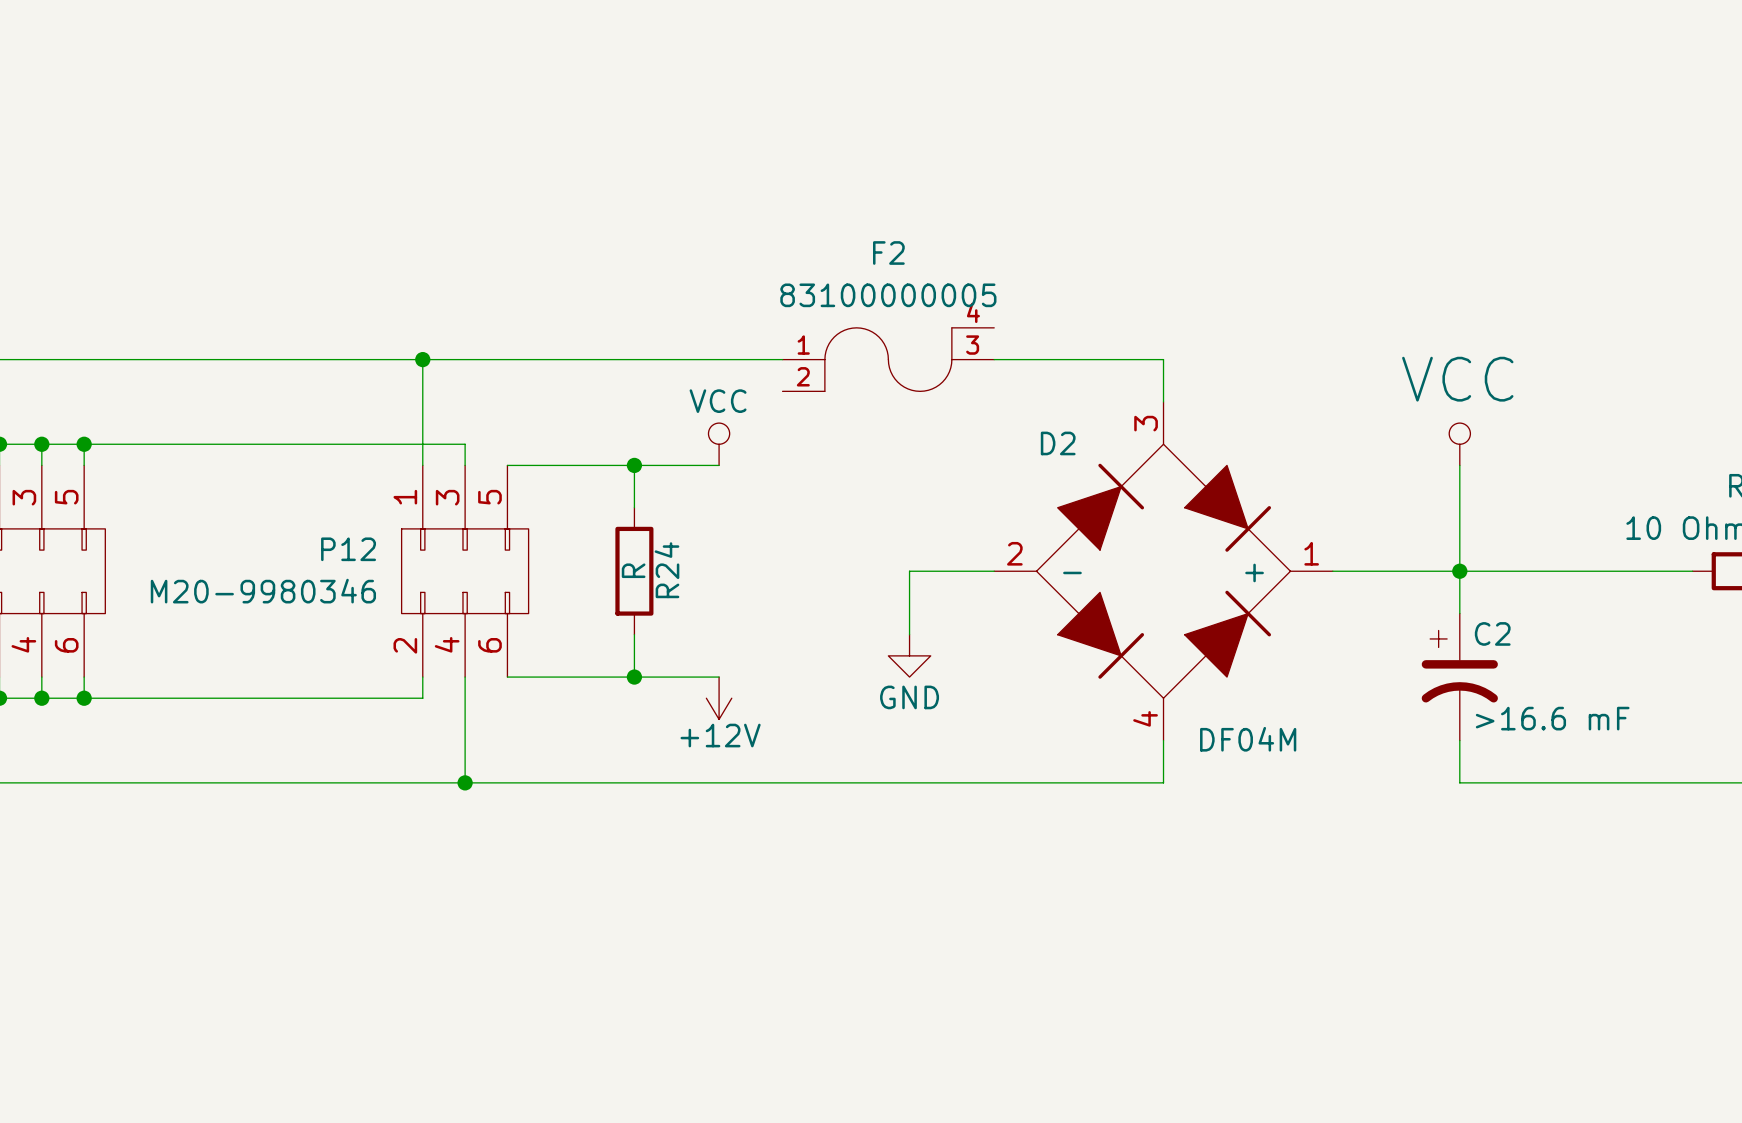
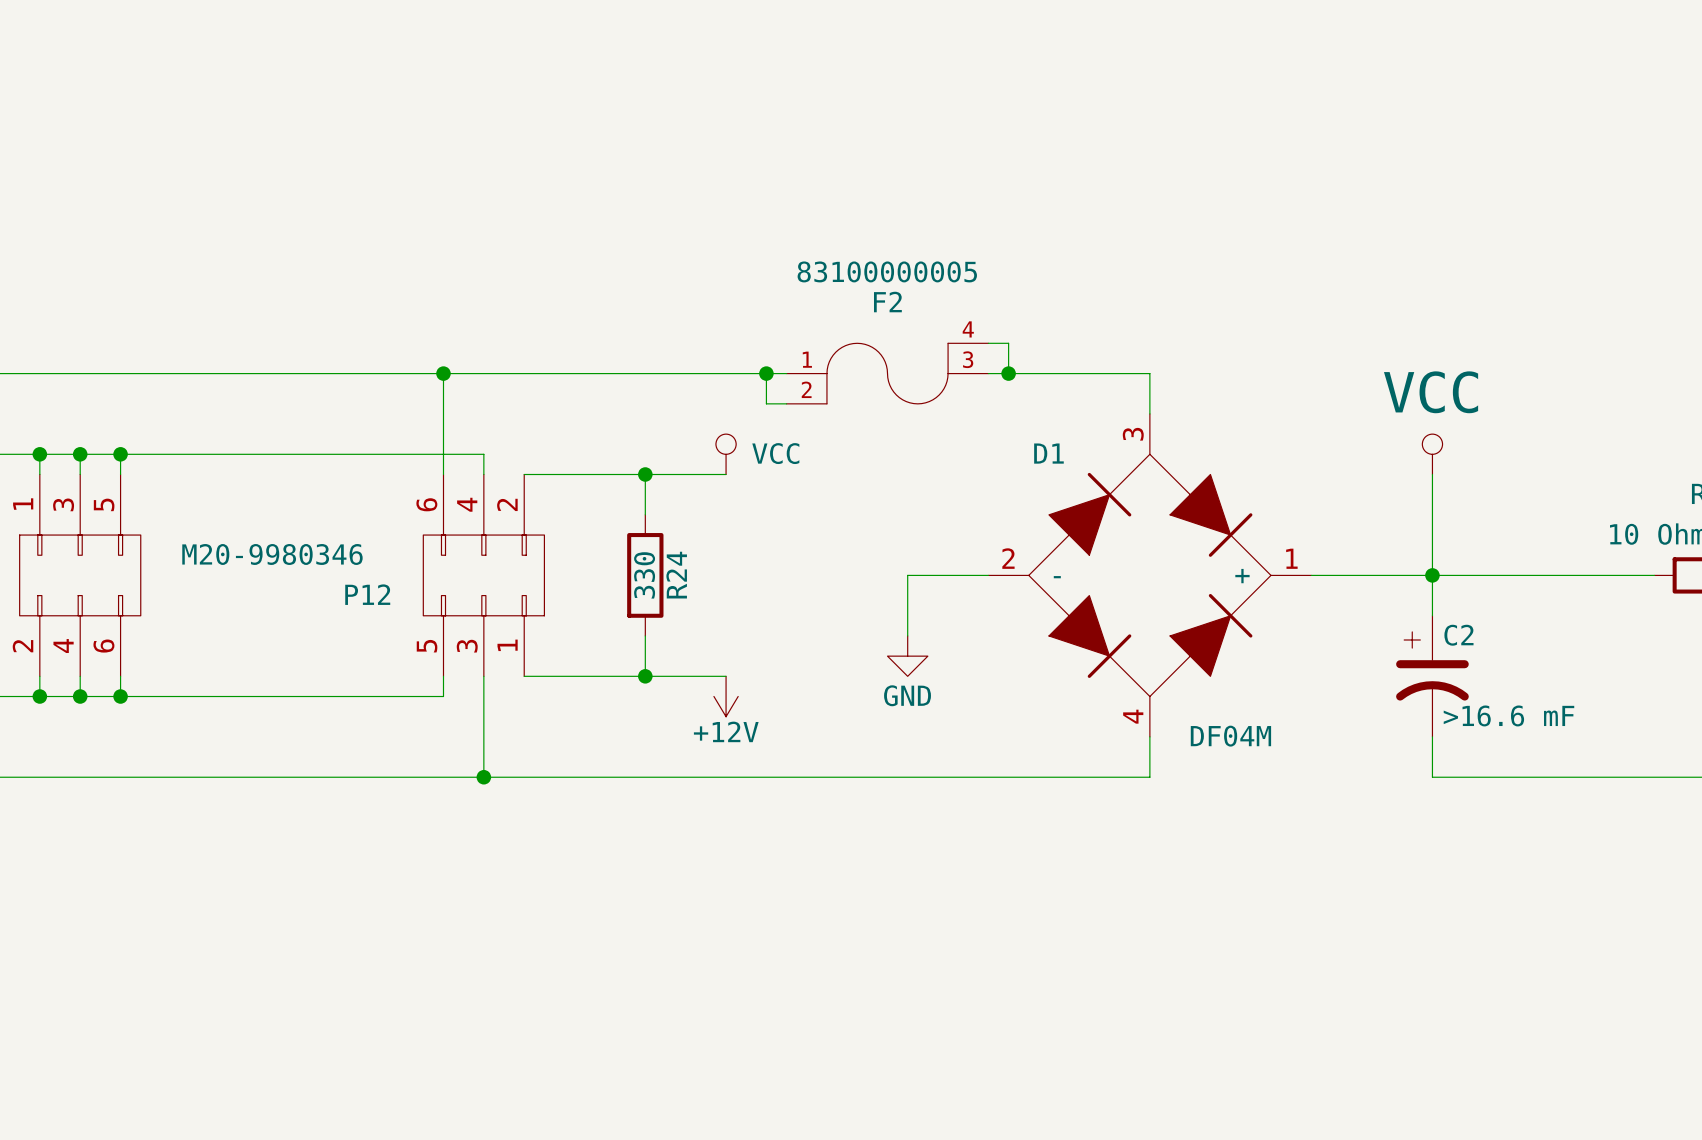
F2 name position: F2 (888, 252) -> F2 (887, 302)
F2 value position: 83100000005 (888, 295) -> 83100000005 (887, 271)
wire: none -> (988, 343) (1008, 343) (1008, 373)
wire: none -> (766, 373) (766, 403) (786, 403)
junction: none -> (766, 373)
junction: none -> (1008, 373)
power symbol text position: VCC (718, 401) -> VCC (775, 453)
D2 name: D2 (1058, 443) -> D1 (1048, 453)
P12 name position: P12 (348, 549) -> P12 (367, 594)
R24 value: R (633, 570) -> 330 (644, 575)
P12 rotation: 0° (465, 571) -> 180° (483, 575)
P12 value position: M20-9980346 (263, 591) -> M20-9980346 (272, 554)

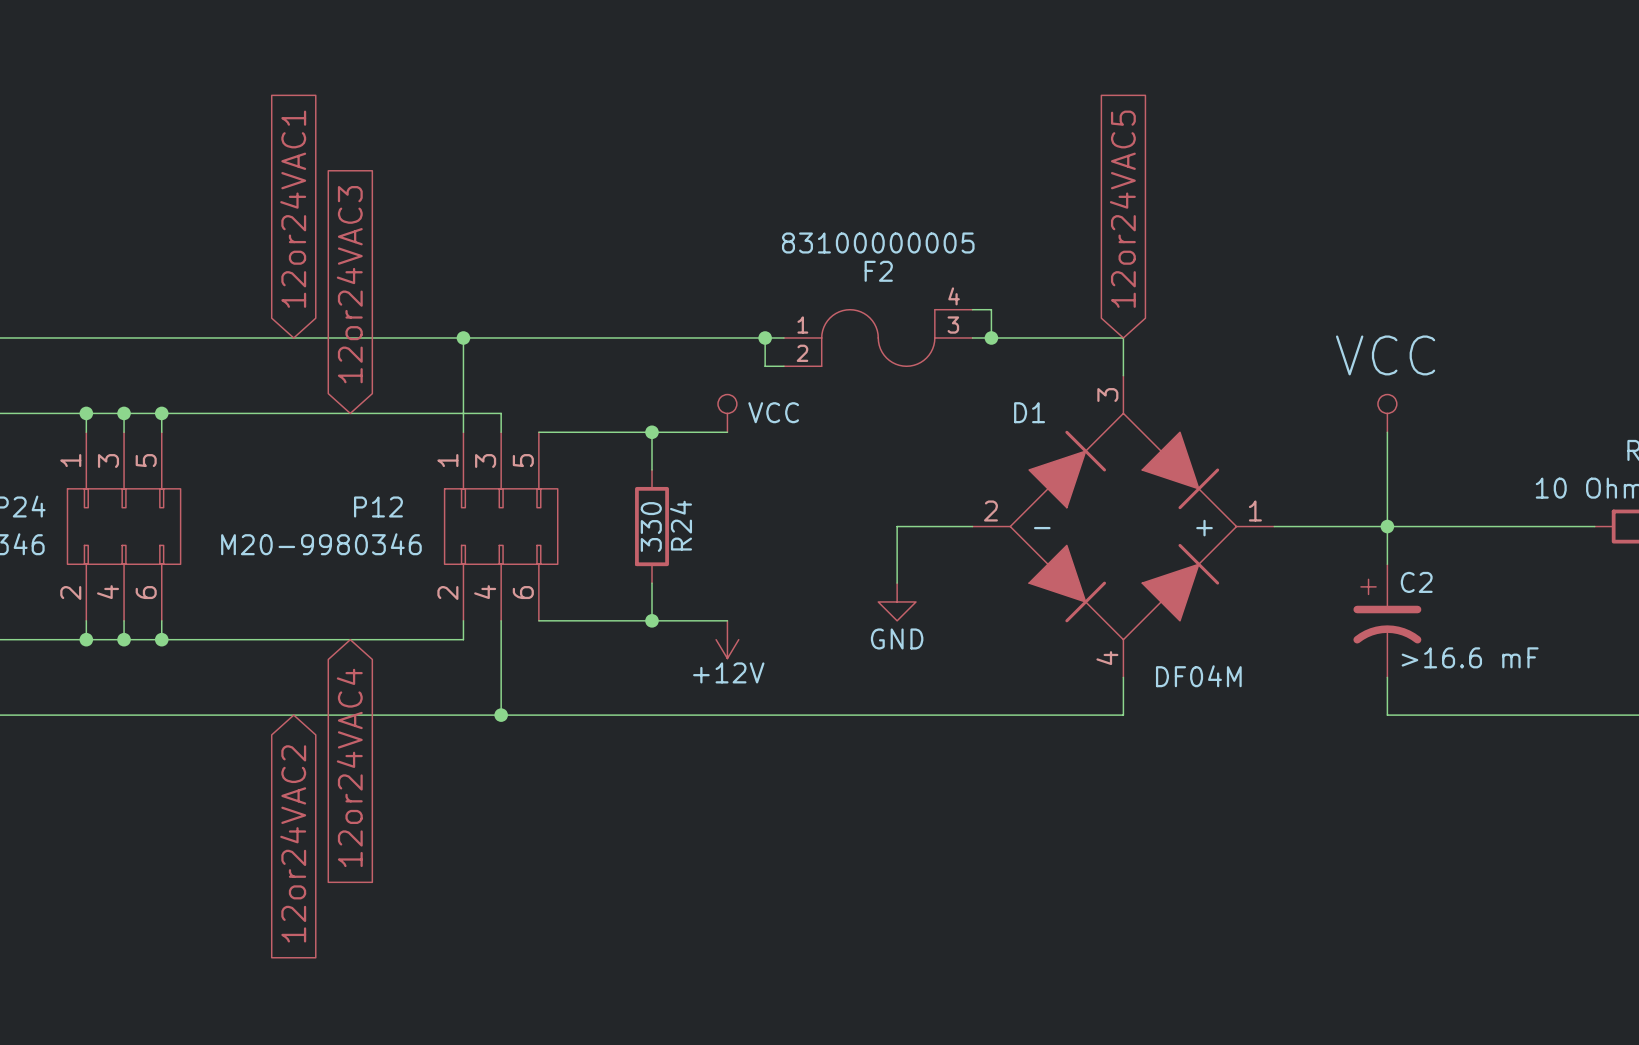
global label: none -> 12or24VAC1 (293, 209)
global label: none -> 12or24VAC5 (1122, 209)
global label: none -> 12or24VAC3 (349, 284)
P12 value position: M20-9980346 (272, 554) -> M20-9980346 (321, 544)
P12 rotation: 0° (483, 575) -> 180° (501, 526)
P12 name position: P12 (367, 594) -> P12 (378, 506)
global label: none -> 12or24VAC4 (349, 767)
global label: none -> 12or24VAC2 (293, 843)

